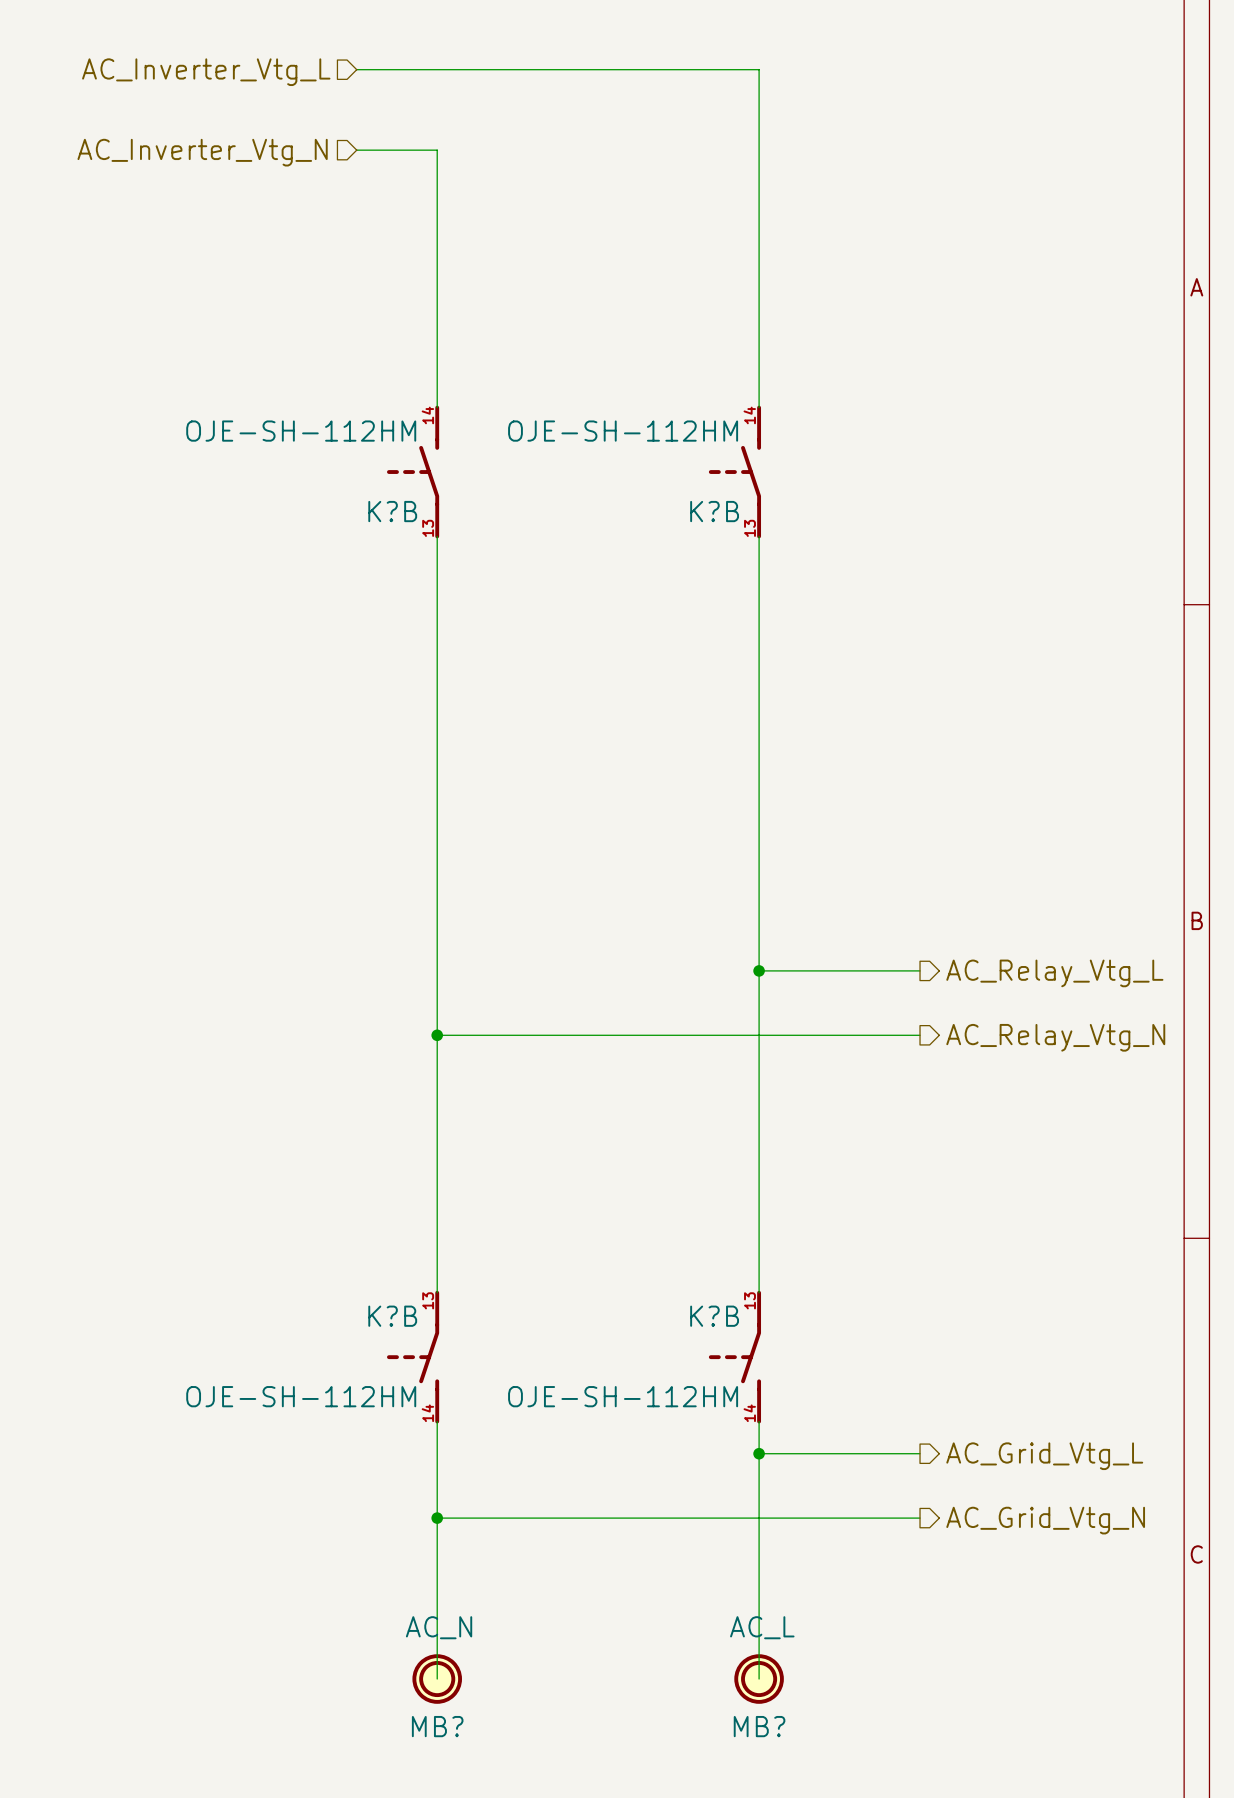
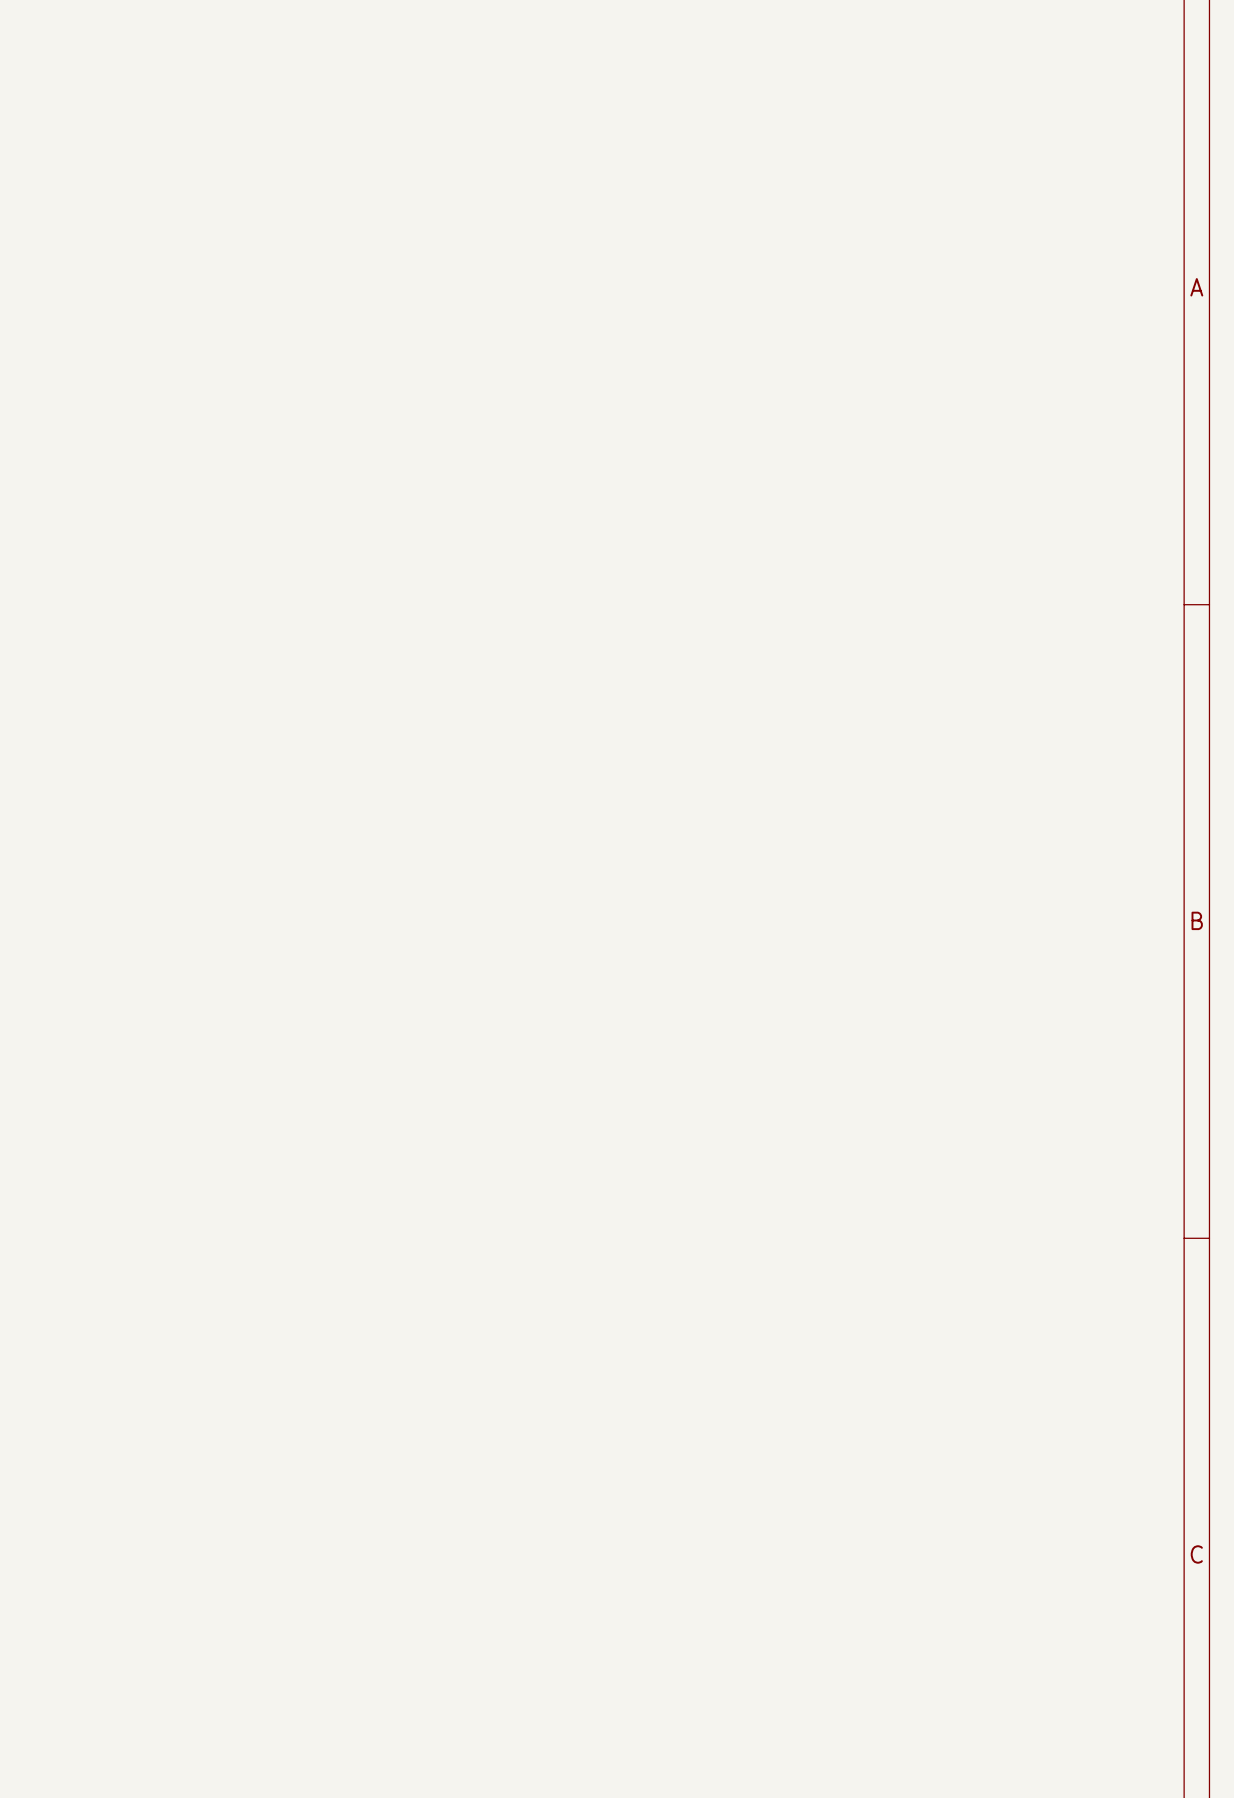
wire: (356, 69) (759, 69) (759, 407) -> none
hierarchical label: AC_Inverter_Vtg_L (206, 72) -> none
wire: (356, 150) (437, 150) (437, 407) -> none
hierarchical label: AC_Inverter_Vtg_N (202, 152) -> none
K?B: OJE-SH-112HM (413, 472) -> none
K?B: OJE-SH-112HM (734, 472) -> none
wire: (437, 536) (437, 1292) -> none
wire: (759, 536) (759, 1292) -> none
wire: (759, 970) (920, 970) -> none
junction: (759, 970) -> none
hierarchical label: AC_Relay_Vtg_L (1054, 973) -> none
wire: (437, 1035) (920, 1035) -> none
junction: (437, 1035) -> none
hierarchical label: AC_Relay_Vtg_N (1055, 1037) -> none
K?B: OJE-SH-112HM (413, 1357) -> none
K?B: OJE-SH-112HM (734, 1357) -> none
wire: (437, 1421) (437, 1679) -> none
wire: (759, 1421) (759, 1679) -> none
wire: (759, 1453) (920, 1453) -> none
junction: (759, 1453) -> none
hierarchical label: AC_Grid_Vtg_L (1044, 1456) -> none
wire: (437, 1518) (920, 1518) -> none
junction: (437, 1518) -> none
hierarchical label: AC_Grid_Vtg_N (1045, 1520) -> none
MB?: AC_N (437, 1679) -> none
MB?: AC_L (759, 1679) -> none

